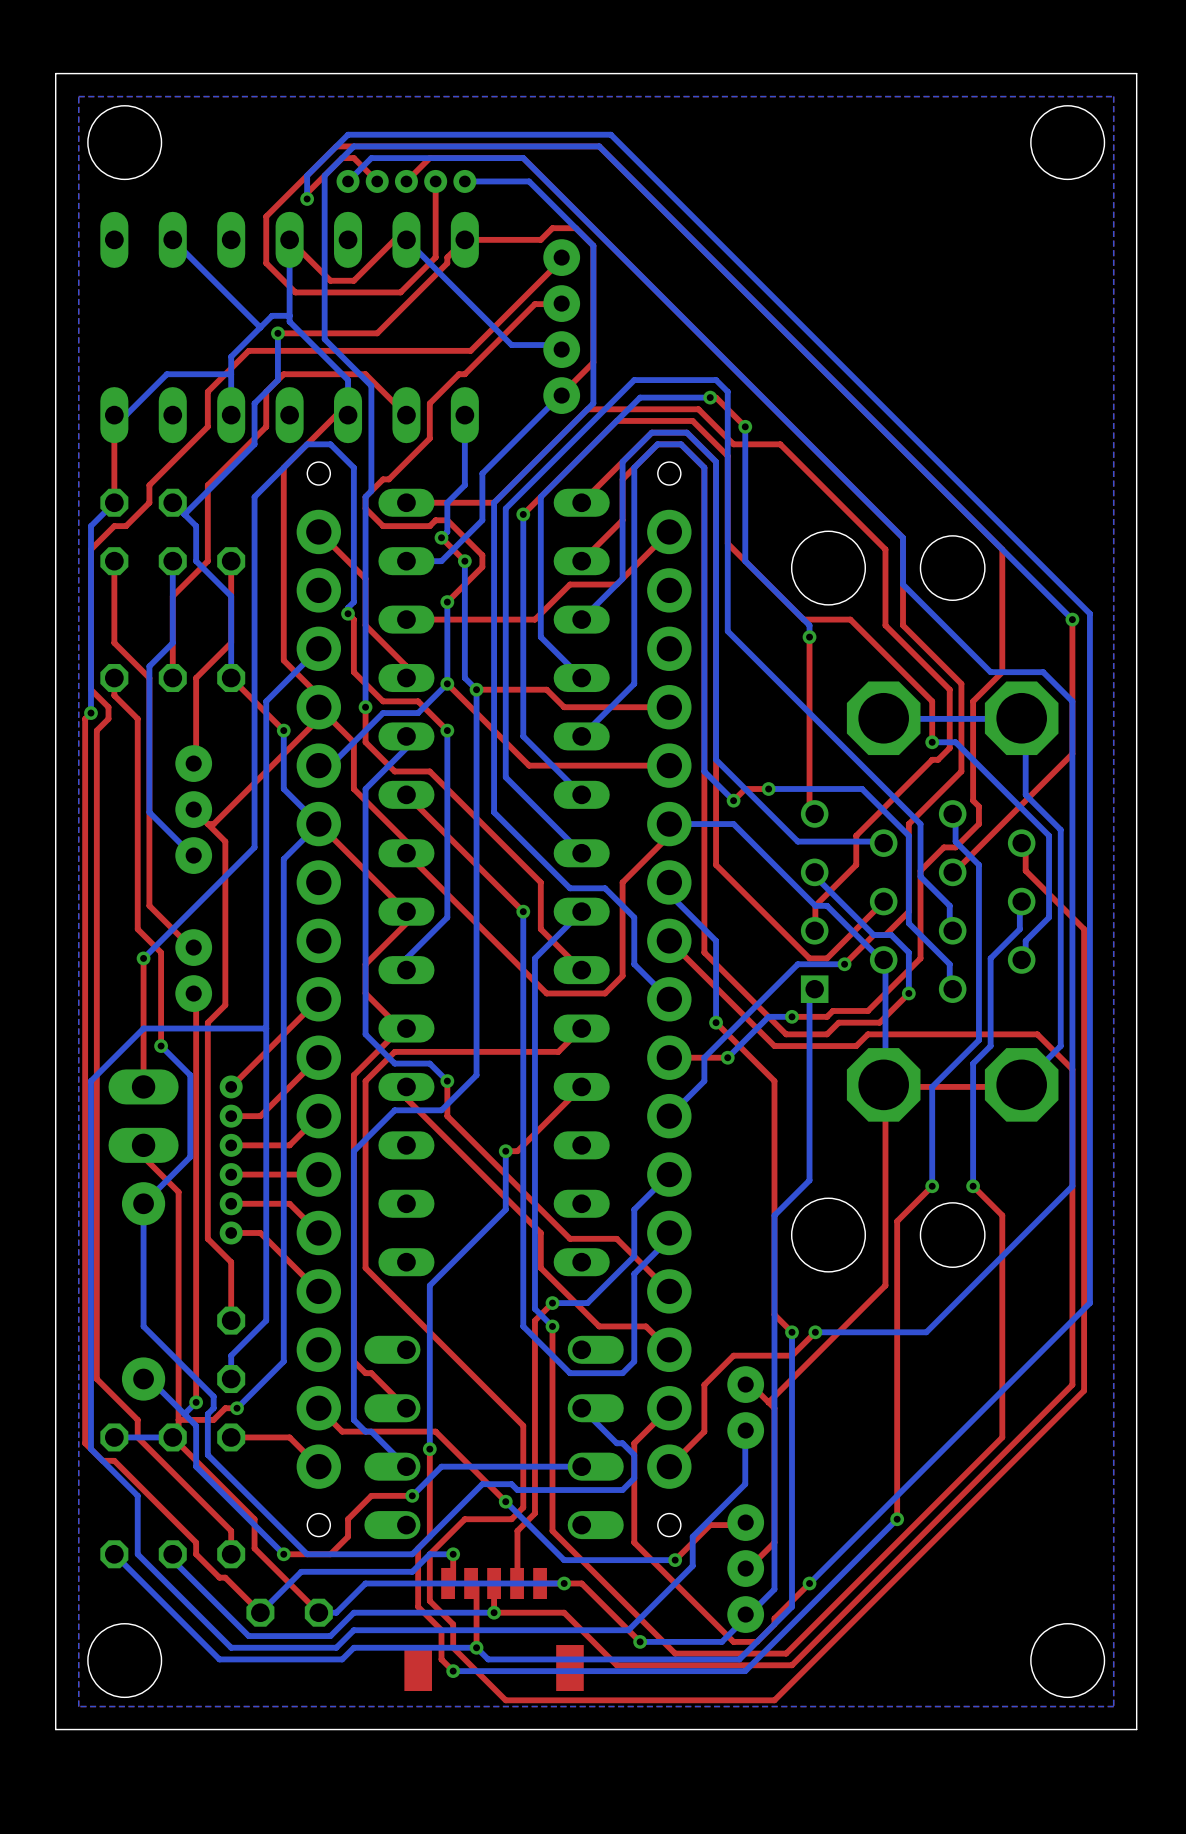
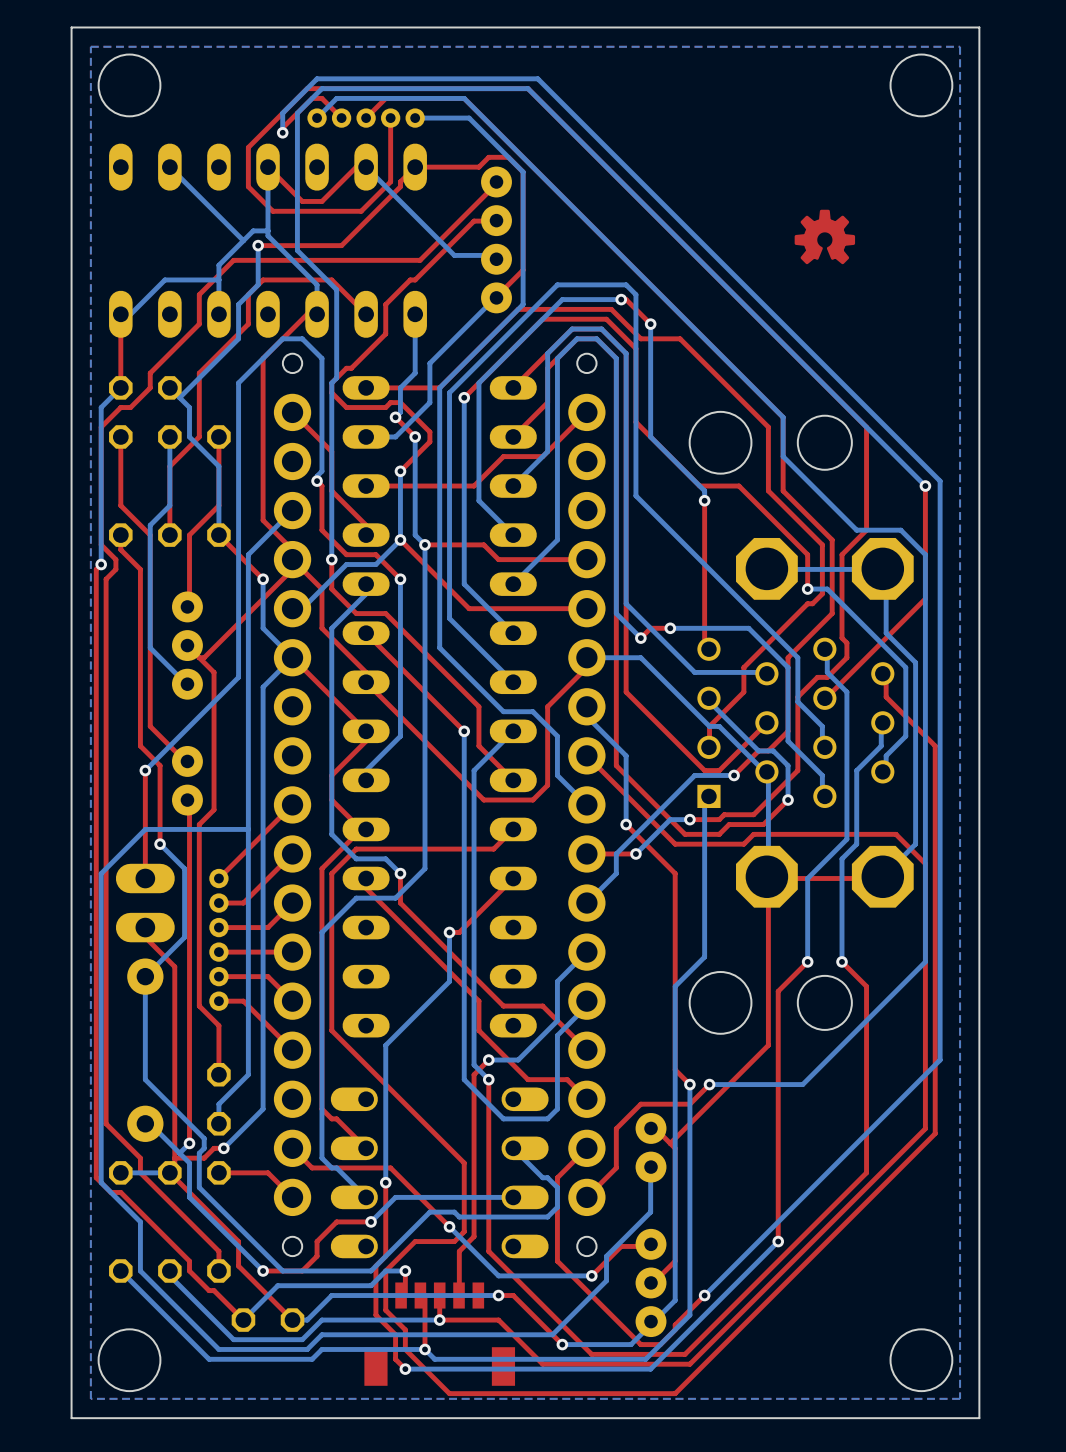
drawing: none -> [794, 209, 856, 265]

